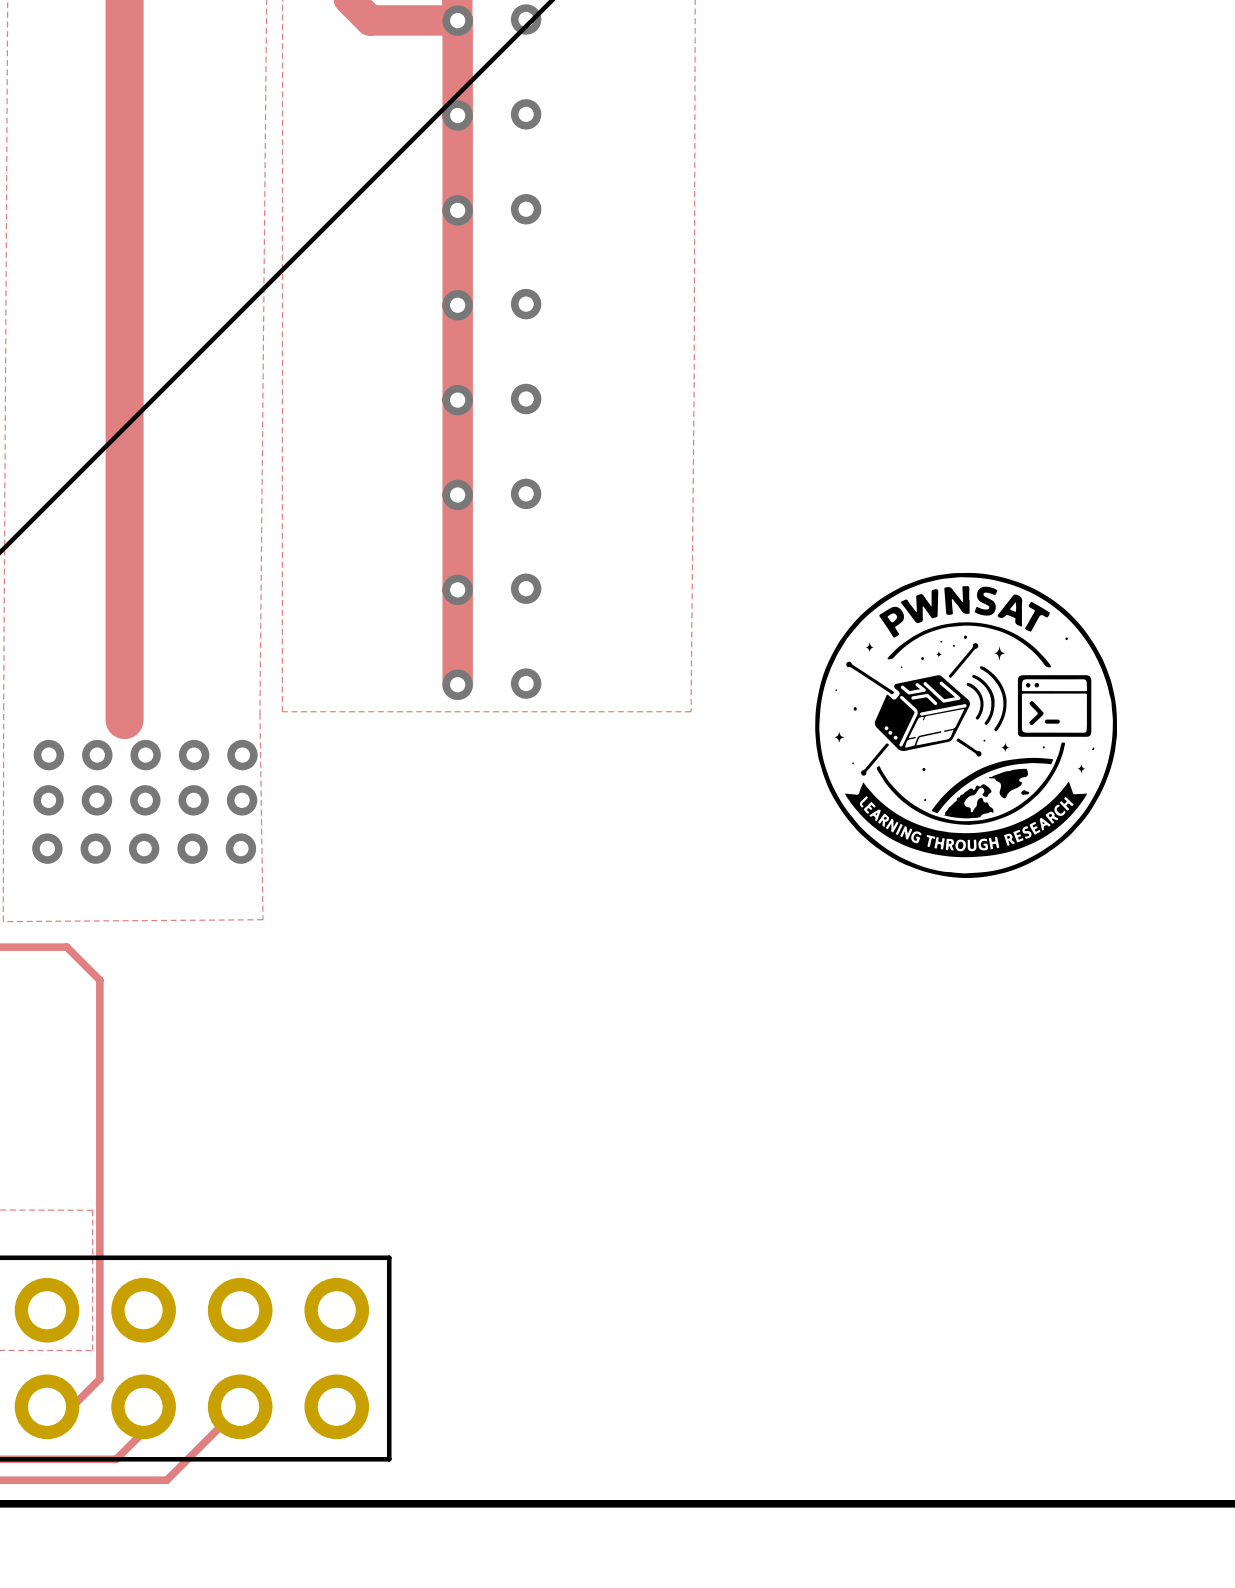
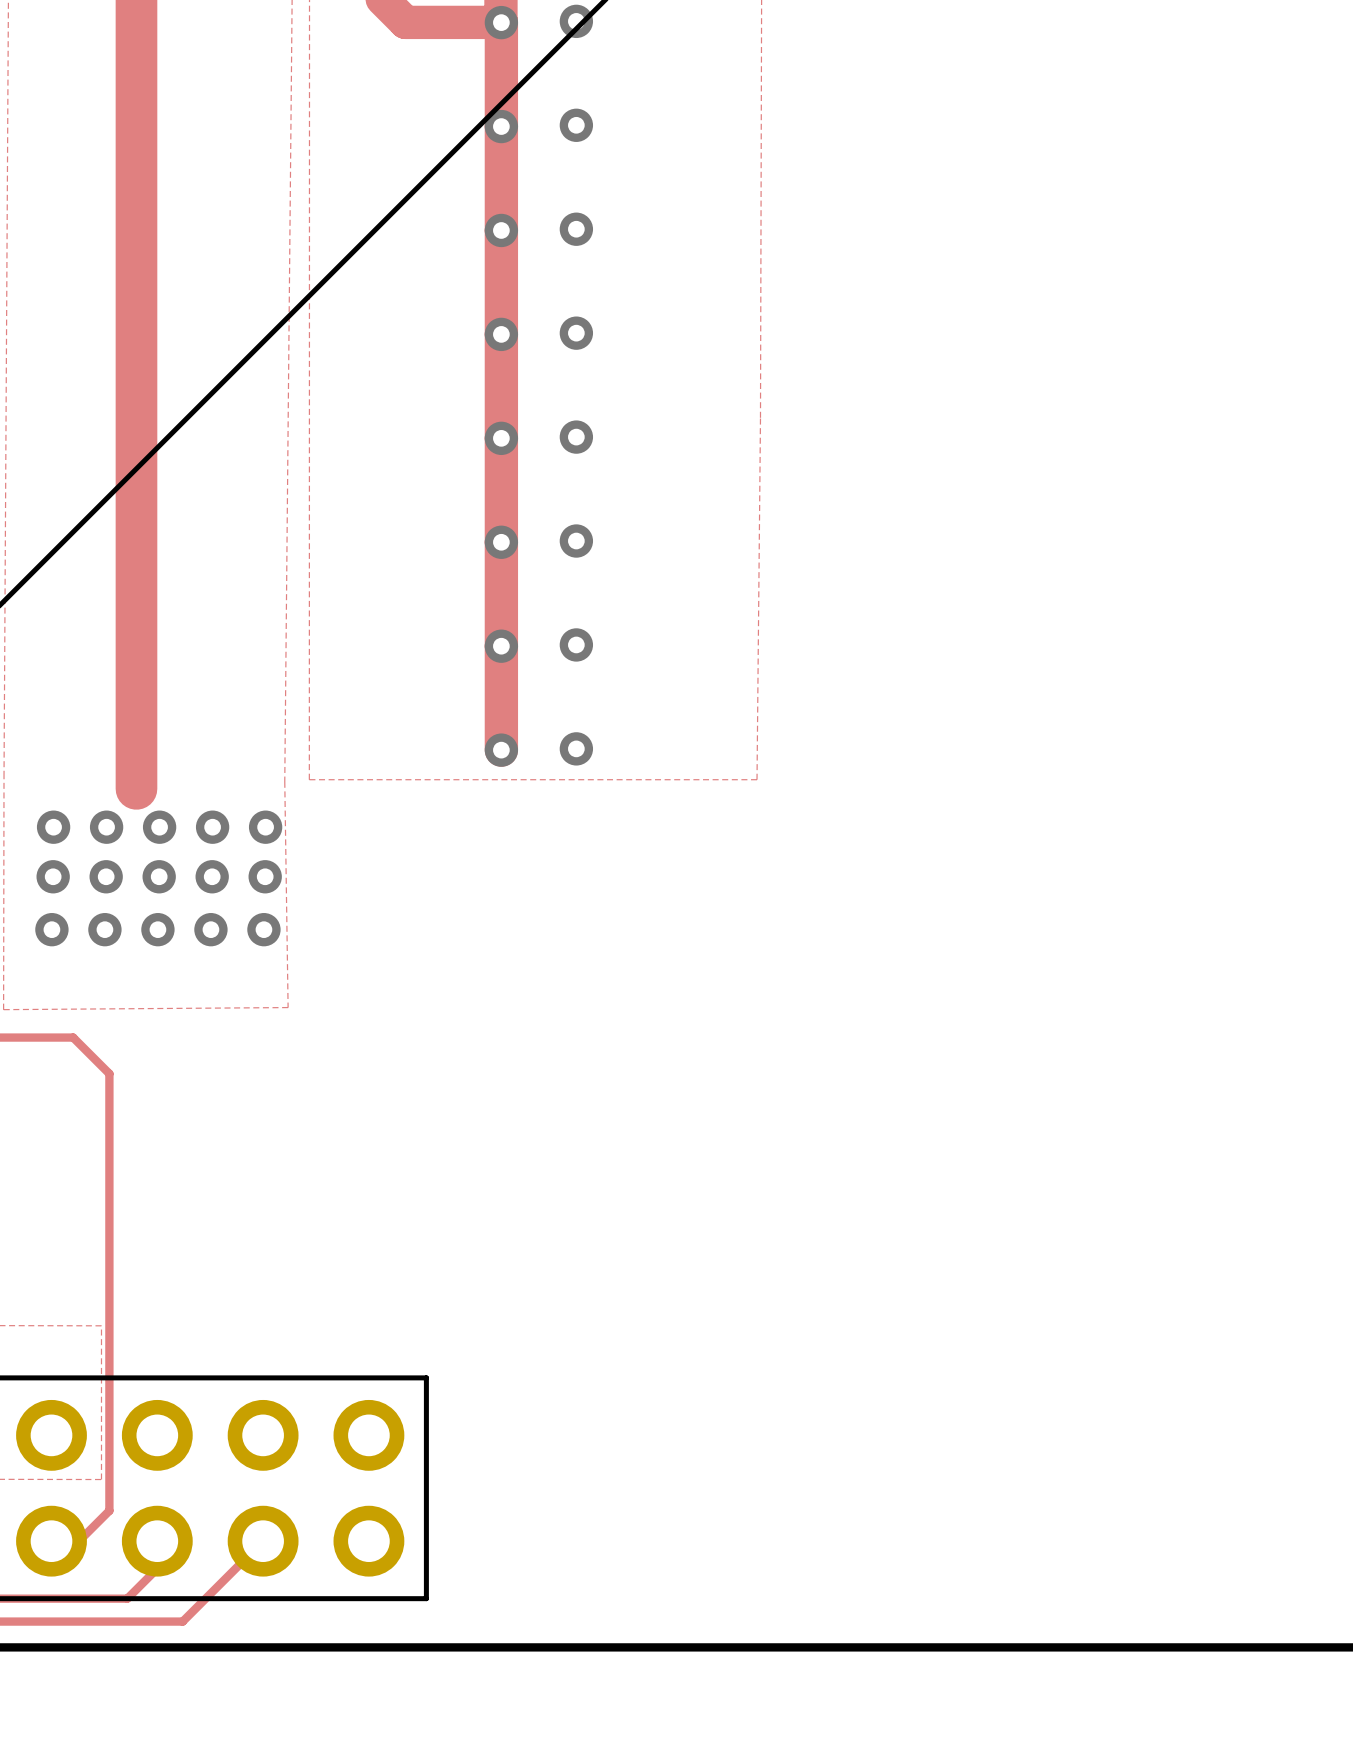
drawing: [815, 572, 1118, 878] -> none

